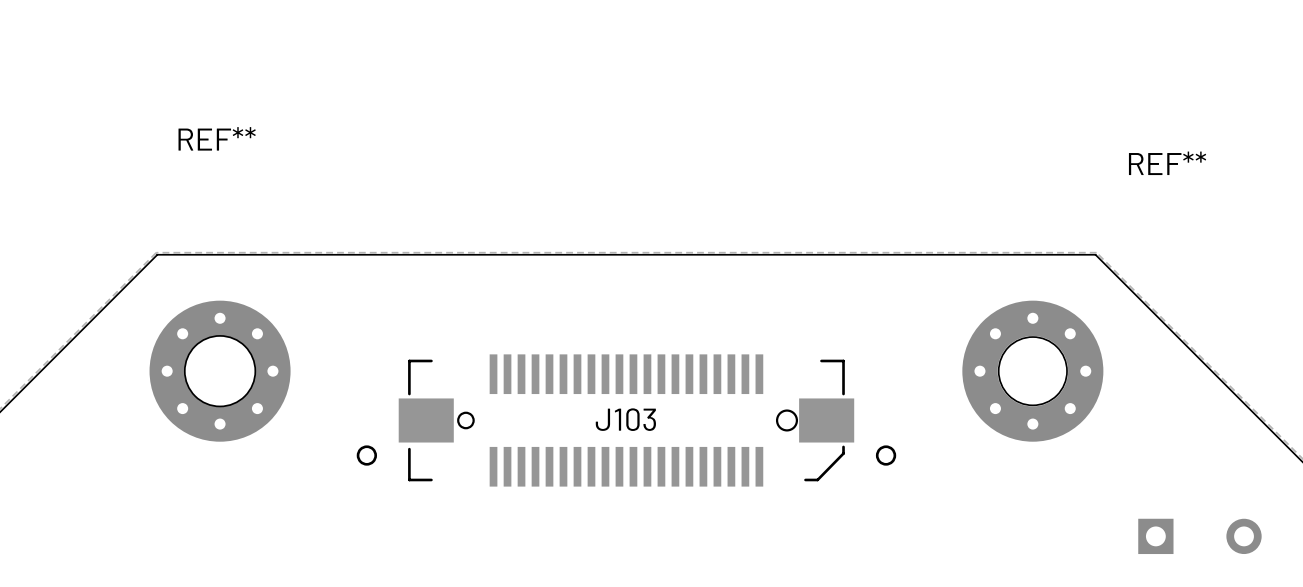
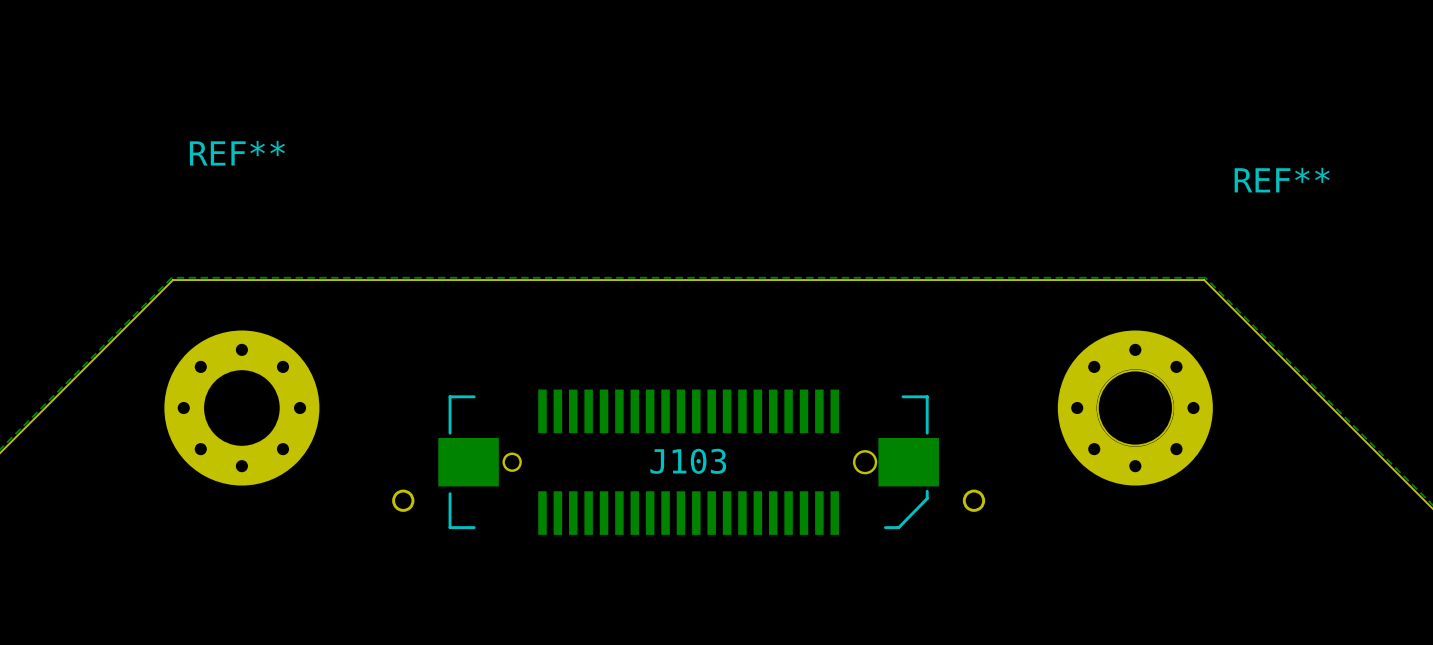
part: (1199, 536) -> none

